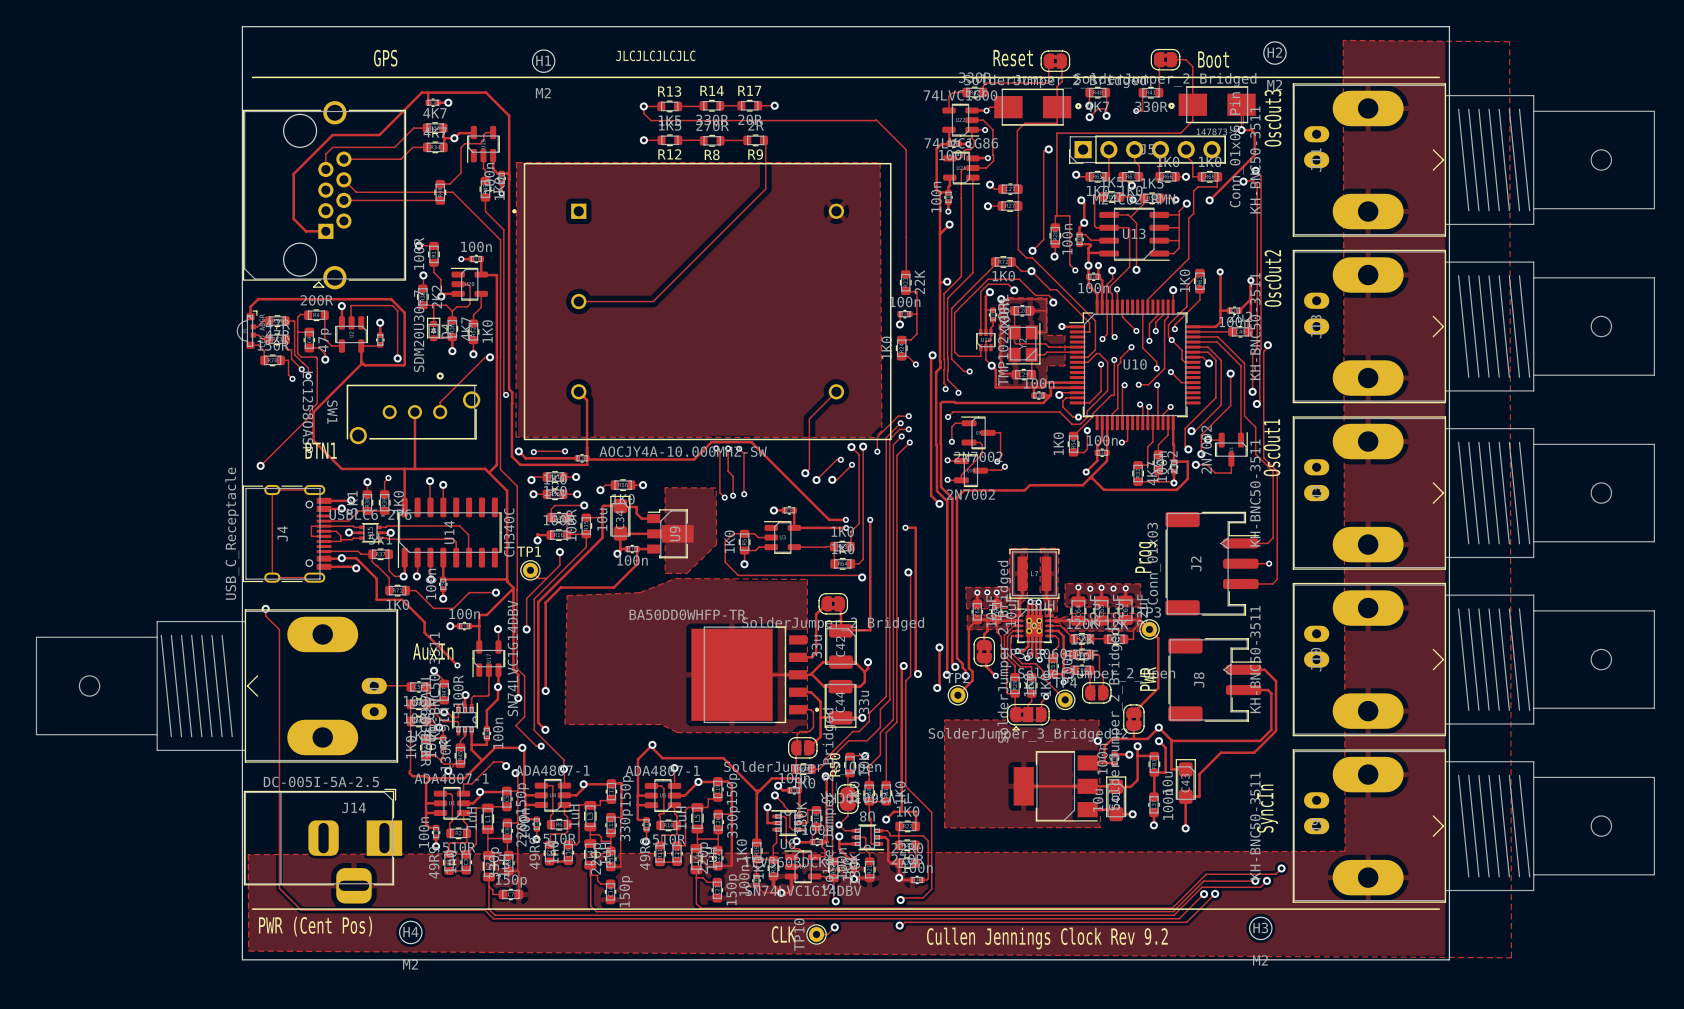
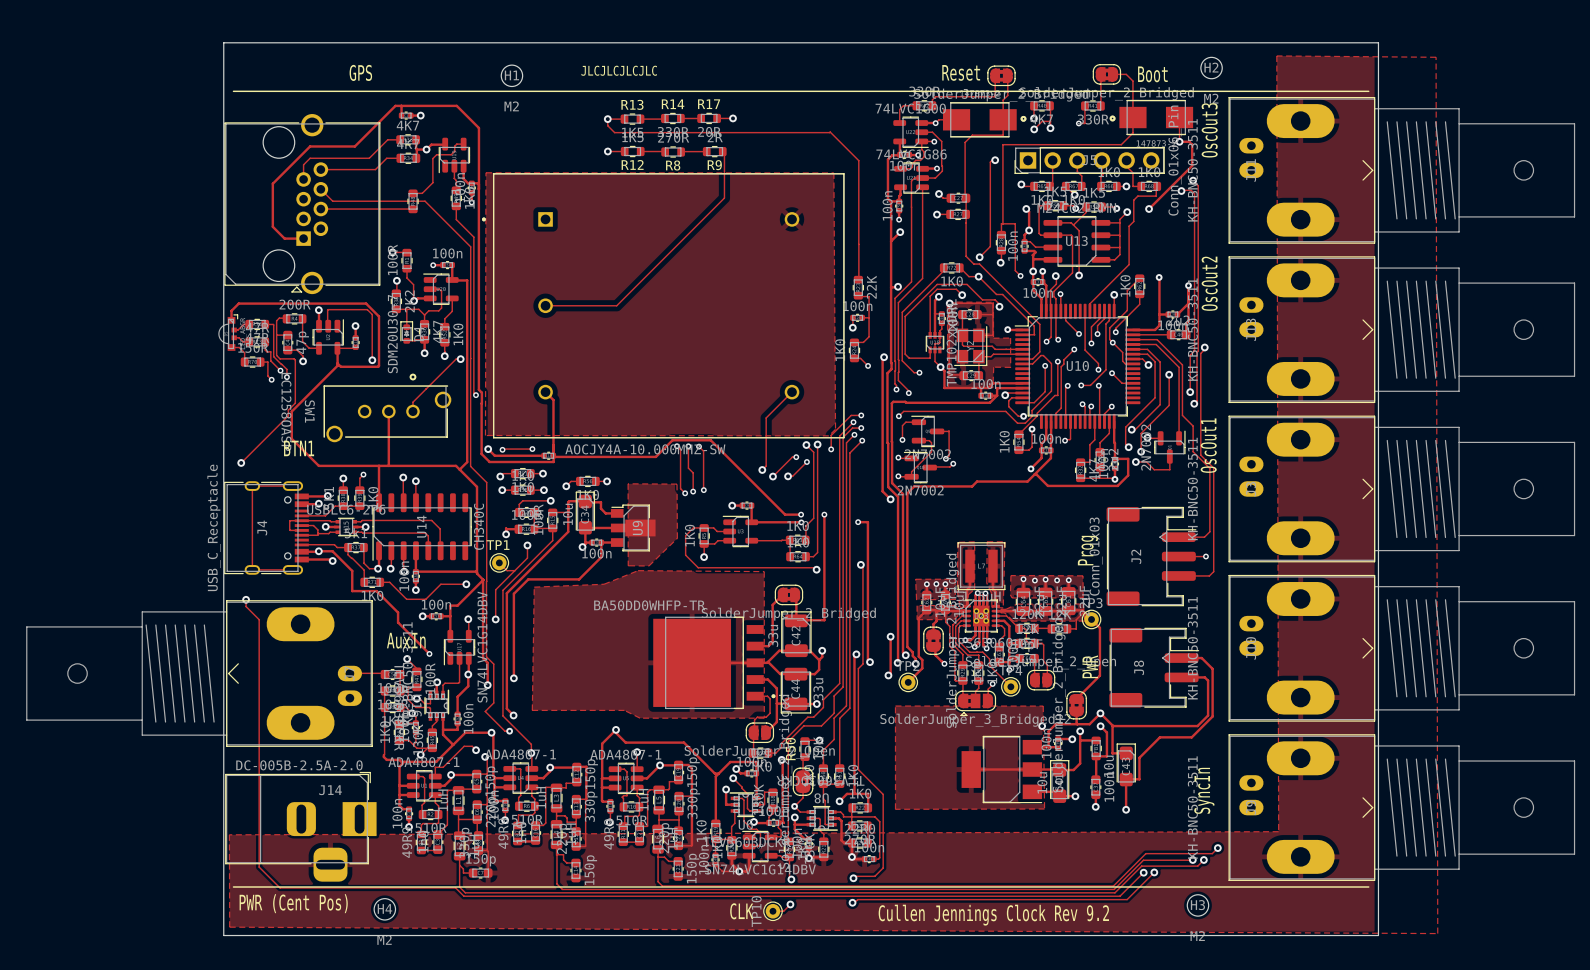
J14 value: DC-005I-5A-2.5 (321, 781) -> DC-005B-2.5A-2.0 (299, 765)

